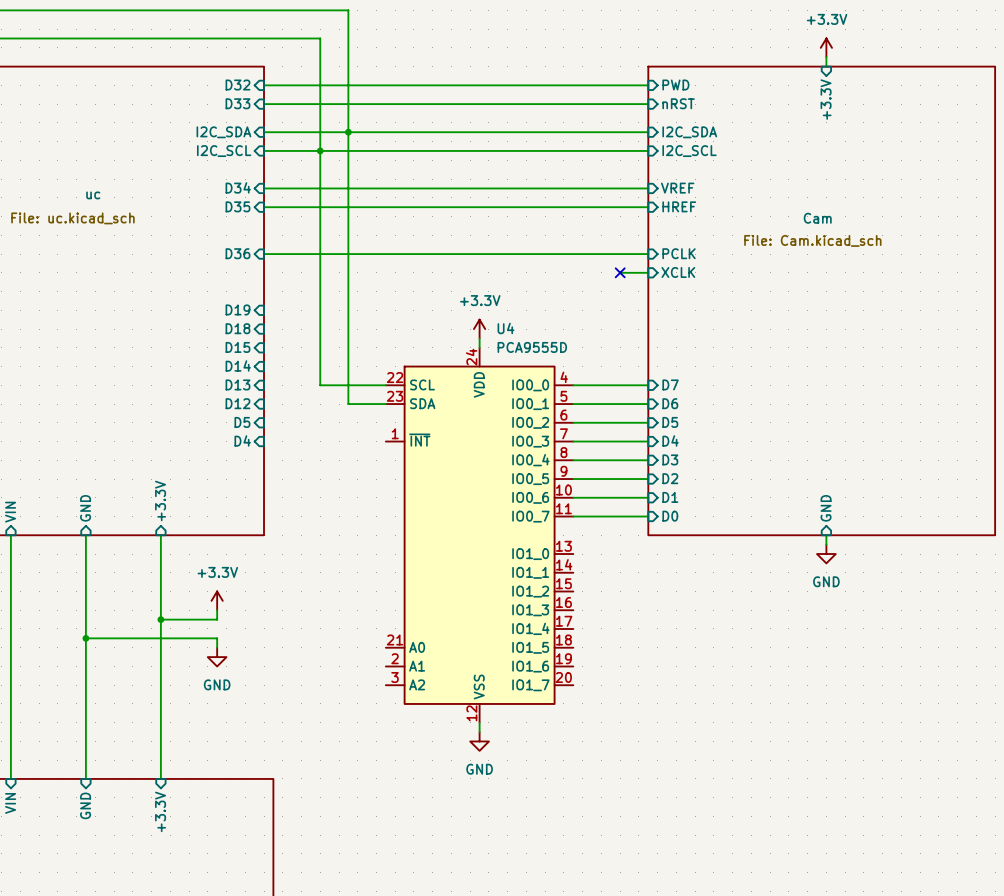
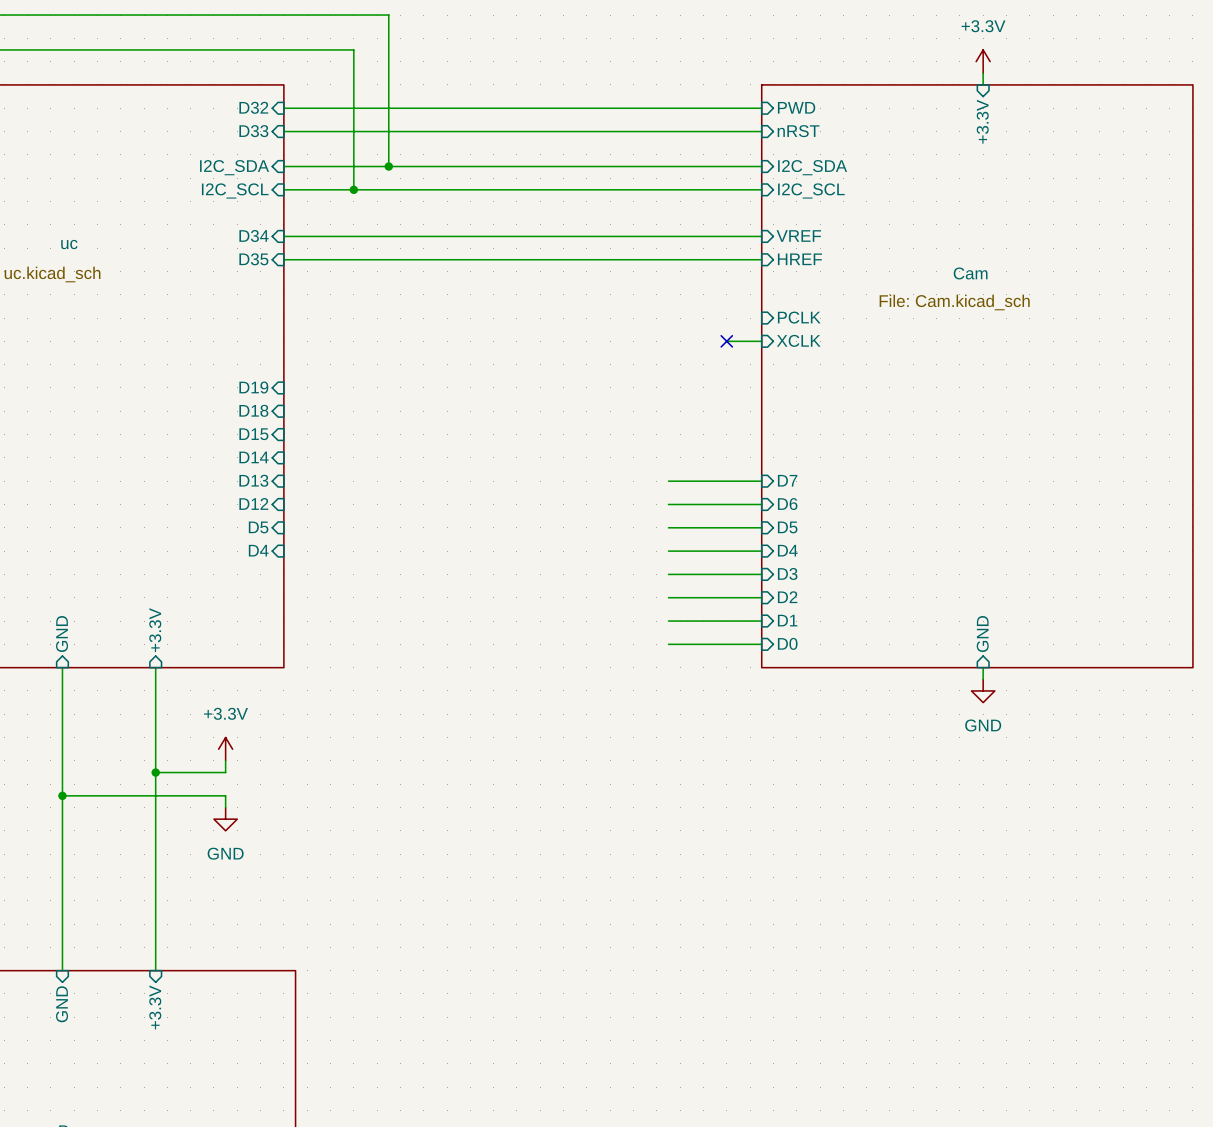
wire: (348, 132) (348, 404) (385, 404) -> none
wire: (320, 150) (320, 385) (385, 385) -> none
sheet pin: D36 (237, 253) -> none
wire: (264, 254) (648, 254) -> none
power symbol: +3.3V (479, 329) -> none
wire: (479, 338) (479, 347) -> none
U4: PCA9555D (479, 535) -> none
wire: (479, 722) (479, 732) -> none
power symbol: GND (479, 741) -> none

